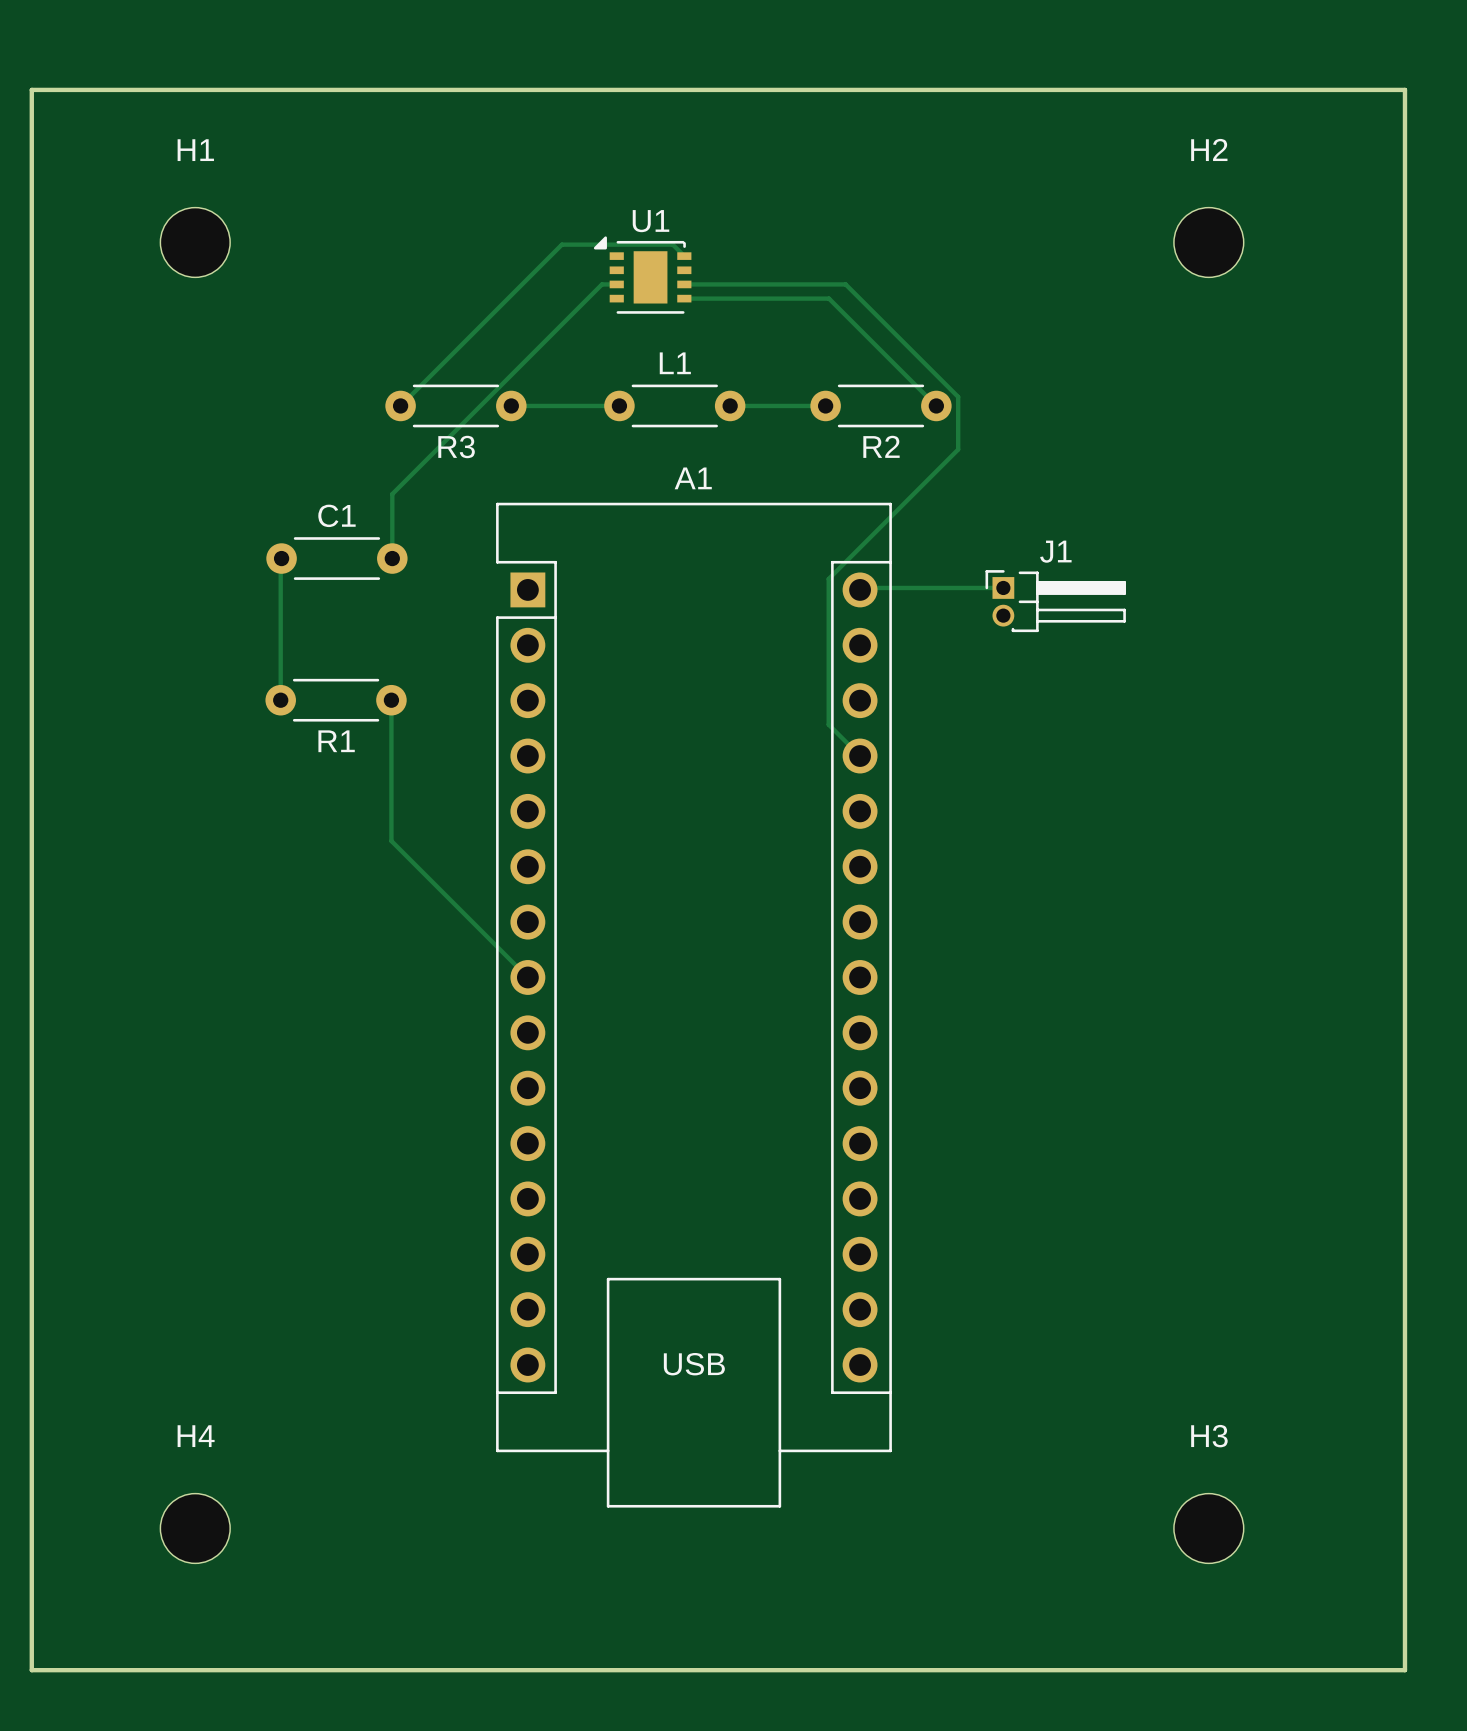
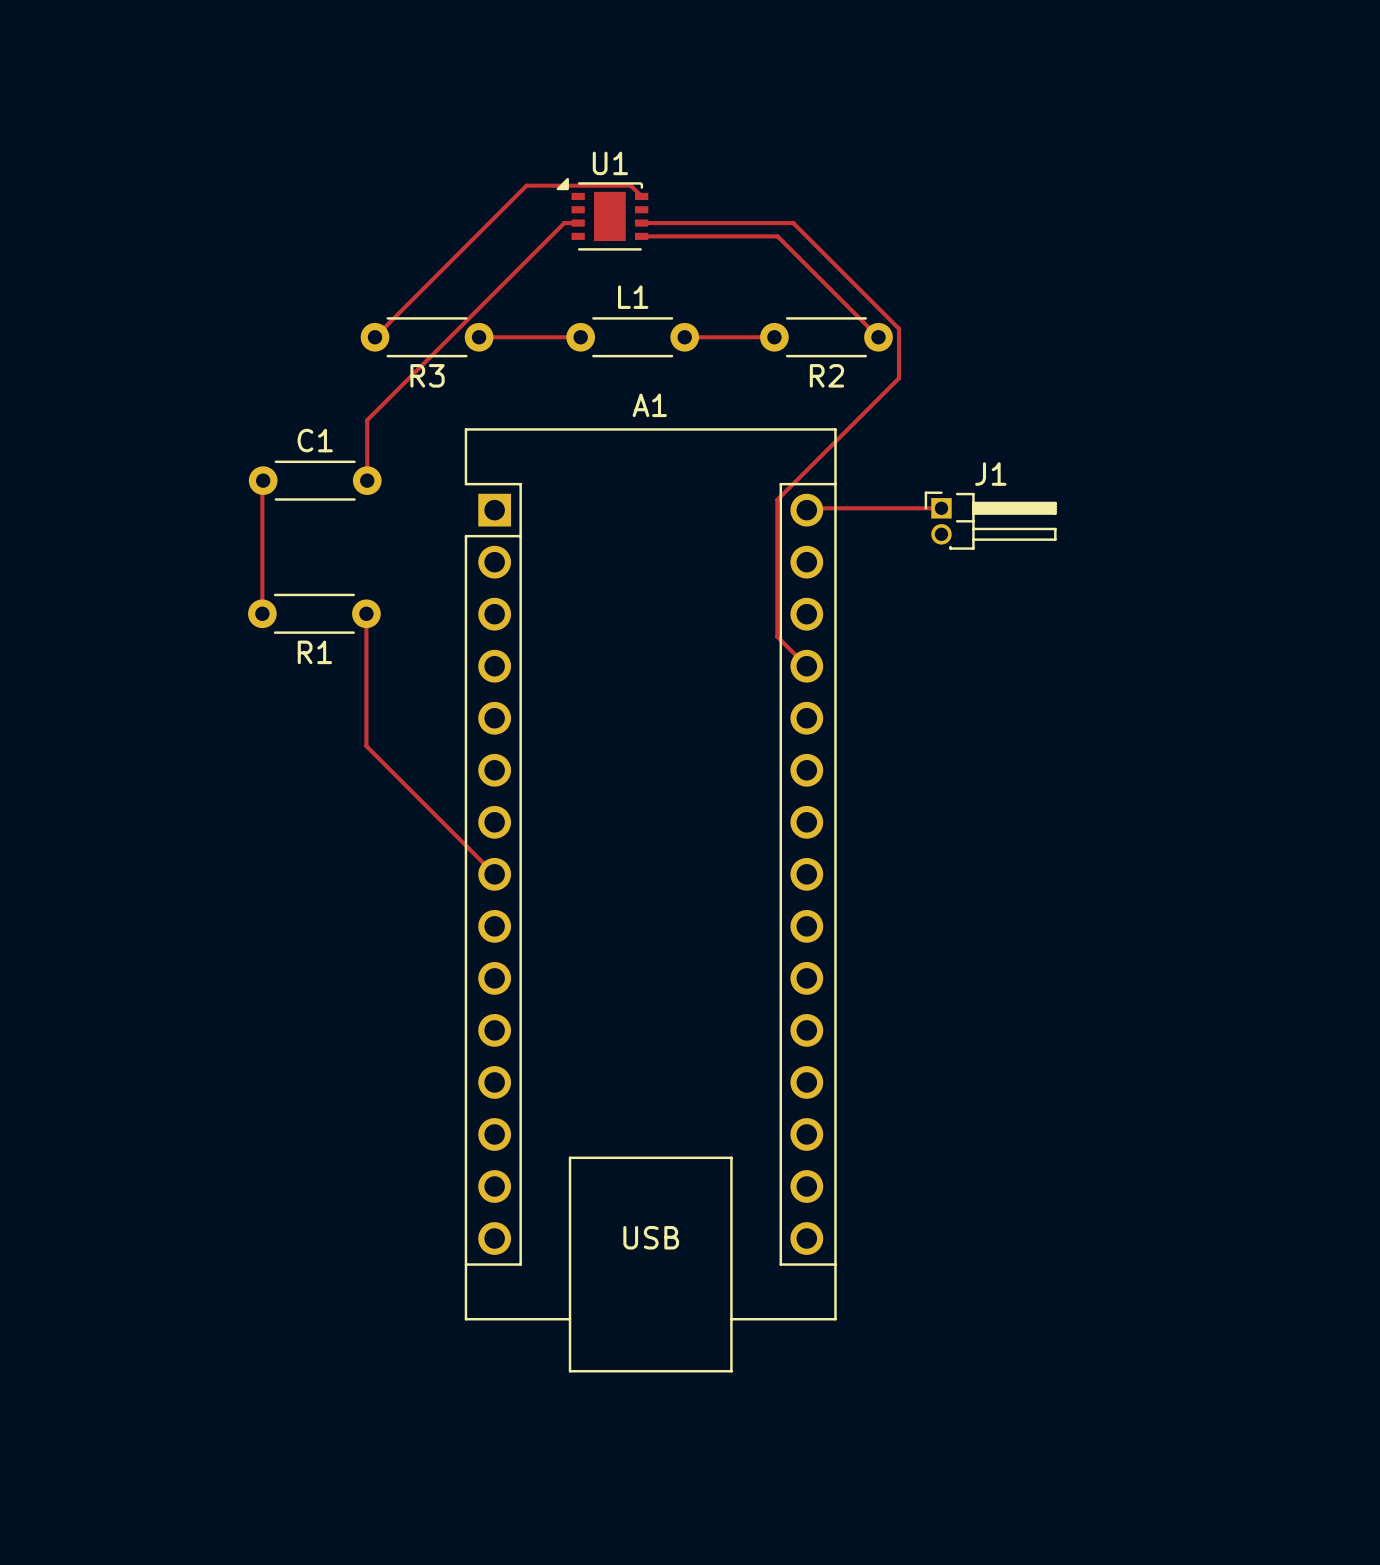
board edge: (31, 89) (1404, 89) (1404, 1670) (31, 1670) (31, 89) -> none
H1: (195, 242) -> none
H2: (1208, 242) -> none
H4: (195, 1528) -> none
H3: (1208, 1528) -> none

